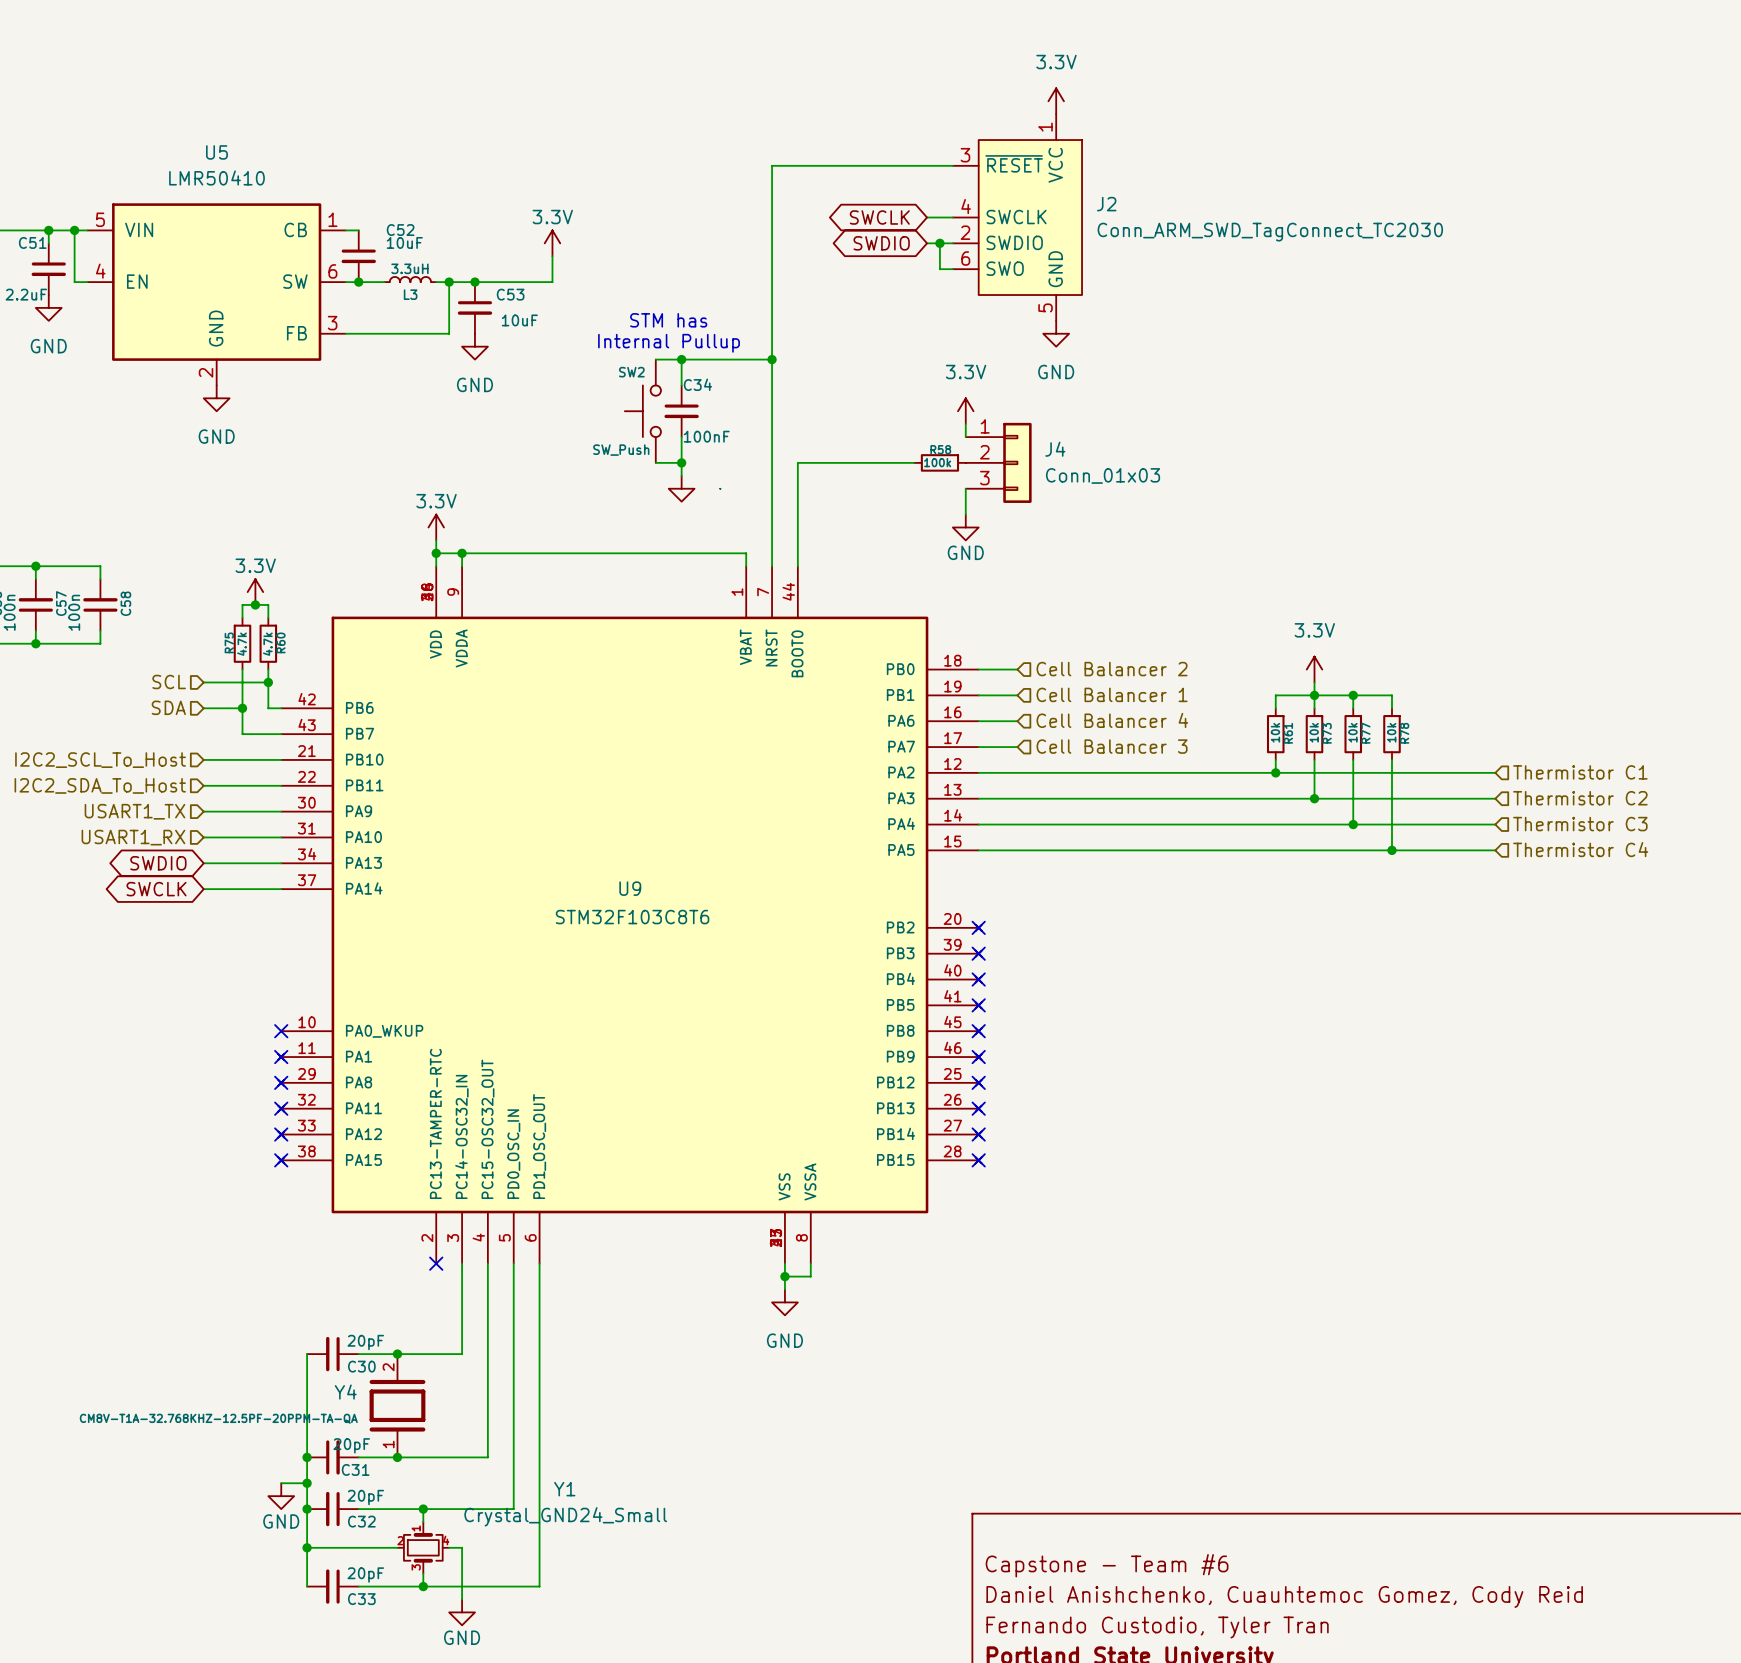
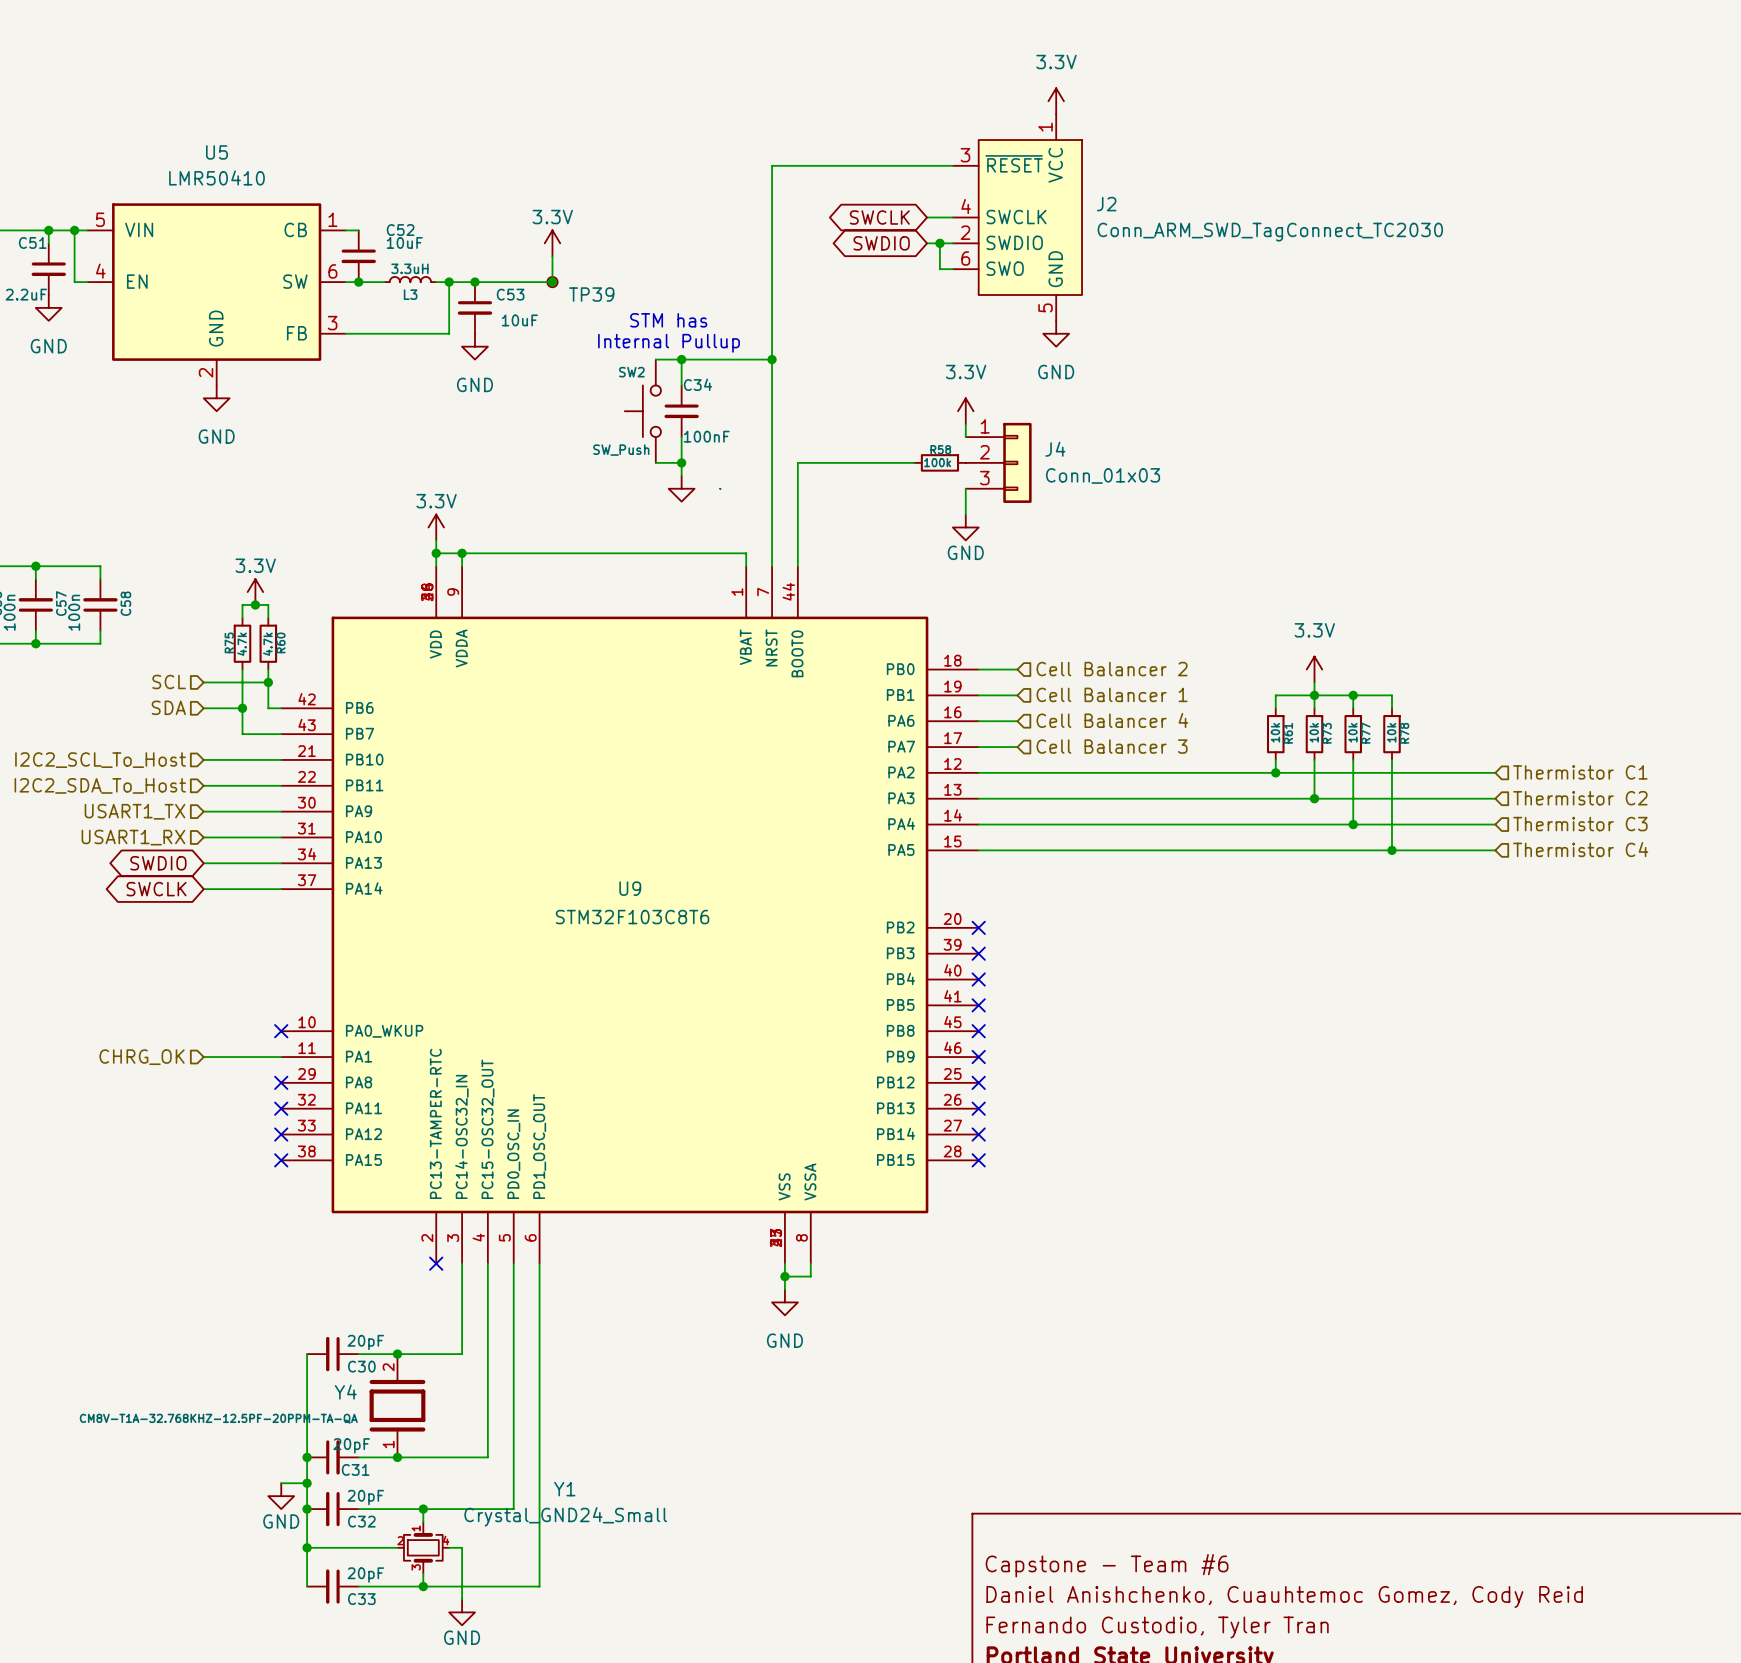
TP39: none -> (552, 282)
junction: none -> (552, 282)
U9 symbol: [278, 566, 982, 1264] -> [281, 566, 979, 1264]
hierarchical label: none -> CHRG_OK (142, 1057)
wire: none -> (203, 1057) (281, 1057)
no-connect mark: (281, 1057) -> none

